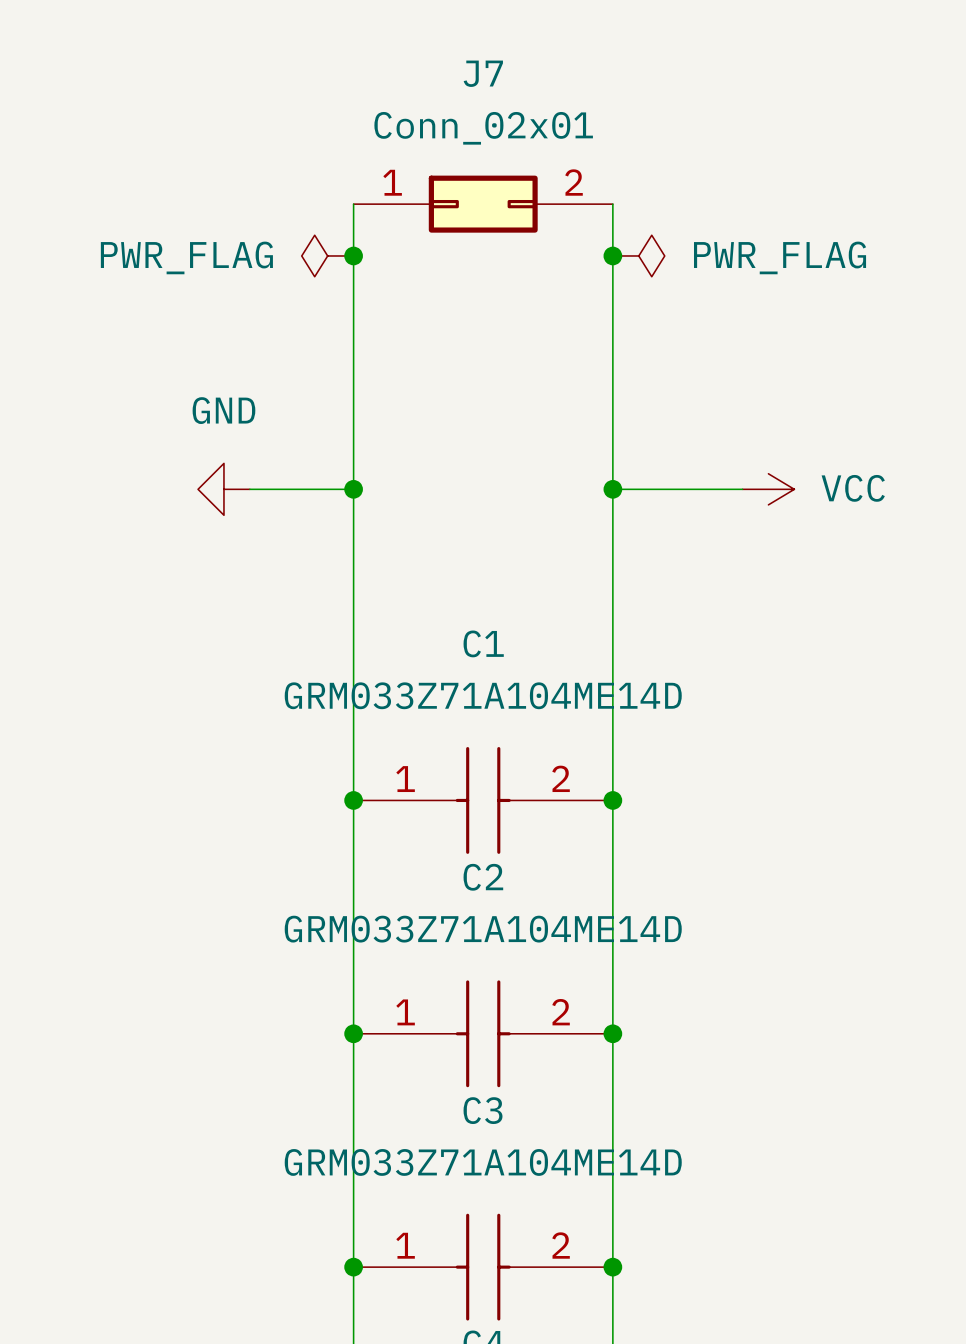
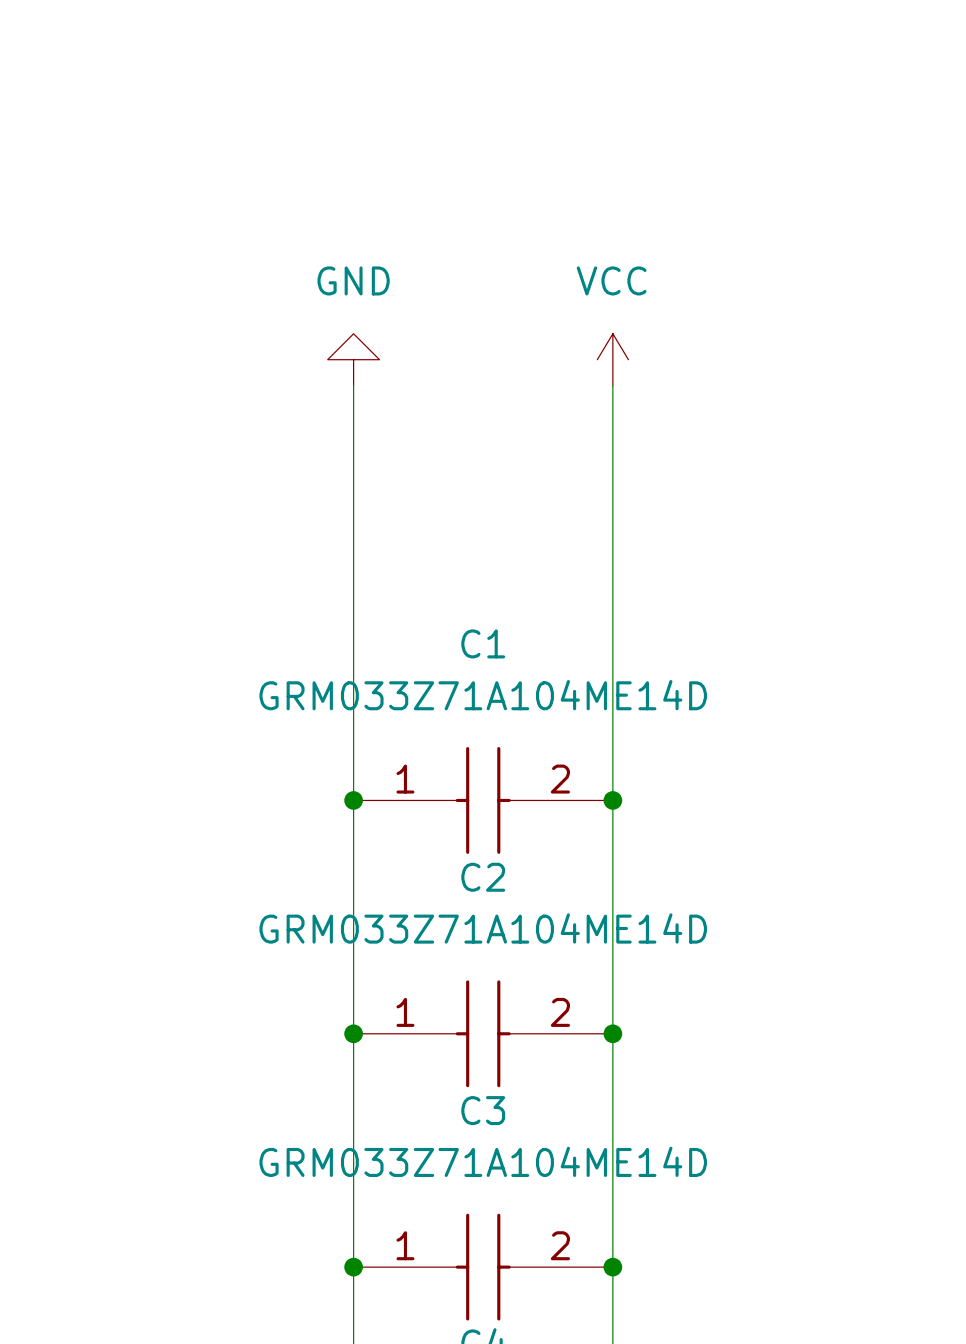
wire: (353, 204) (353, 385) -> none
J7: Conn_02x01 (483, 204) -> none
wire: (612, 204) (612, 385) -> none
power symbol: PWR_FLAG (327, 255) -> none
junction: (353, 255) -> none
junction: (612, 255) -> none
power symbol: PWR_FLAG (638, 255) -> none
power symbol rotation: 0° (223, 489) -> 90° clockwise (353, 359)
power symbol position: GND (223, 489) -> GND (353, 359)
wire: (249, 489) (353, 489) -> none
junction: (353, 489) -> none
wire: (612, 489) (742, 489) -> none
junction: (612, 489) -> none
power symbol rotation: 0° (768, 489) -> 90° counterclockwise (612, 359)
power symbol position: VCC (768, 489) -> VCC (612, 359)

